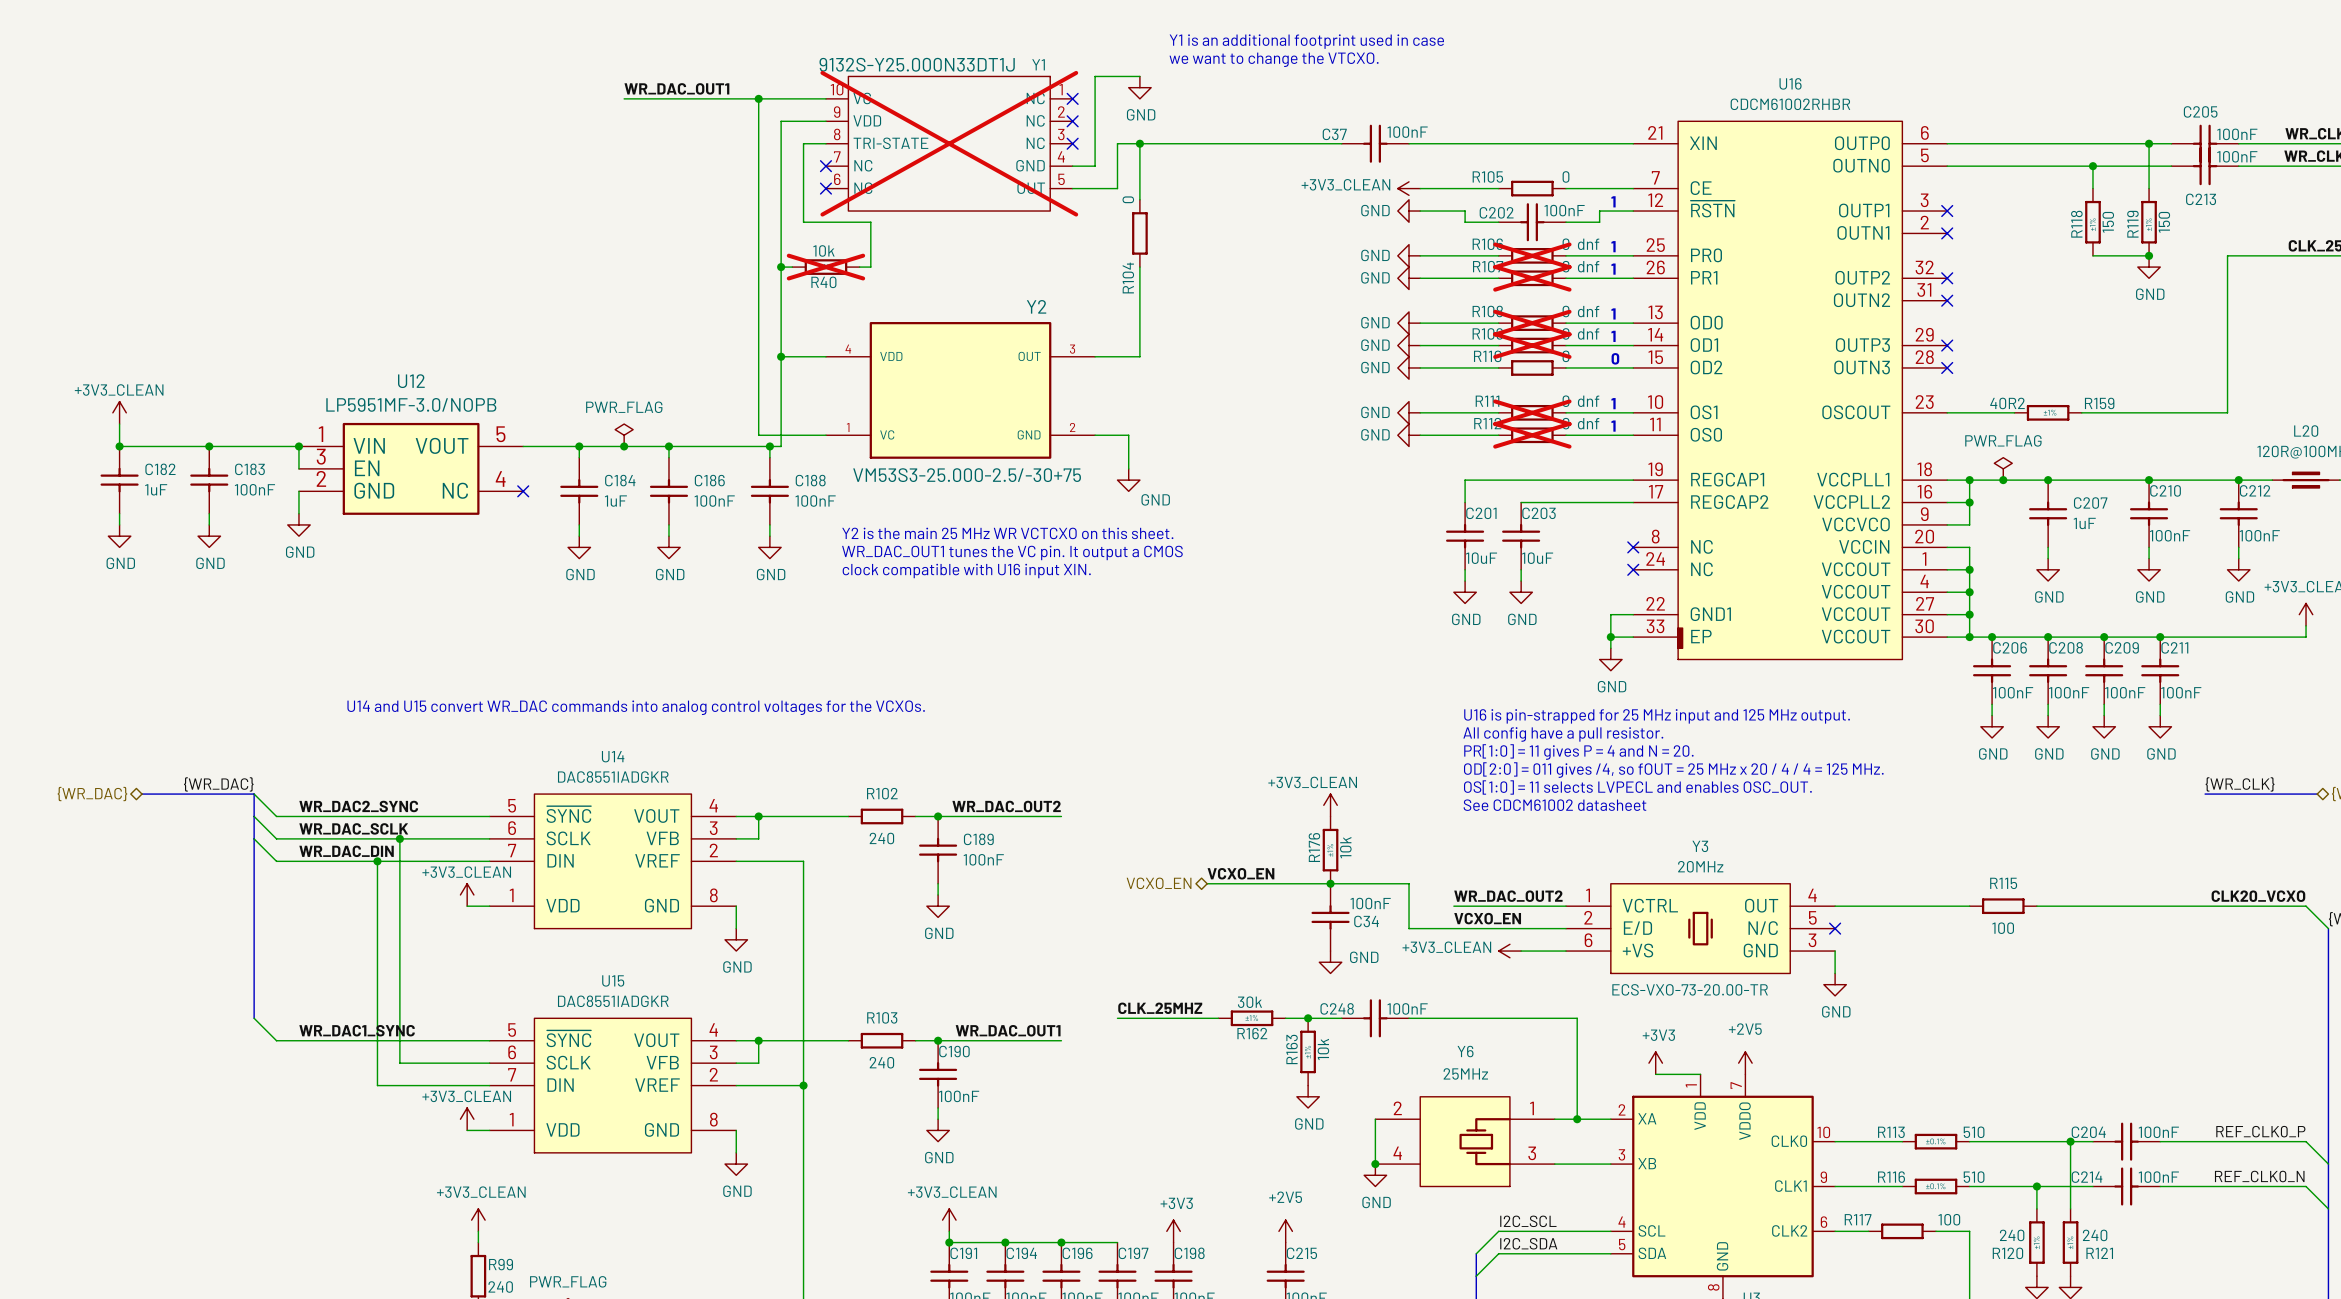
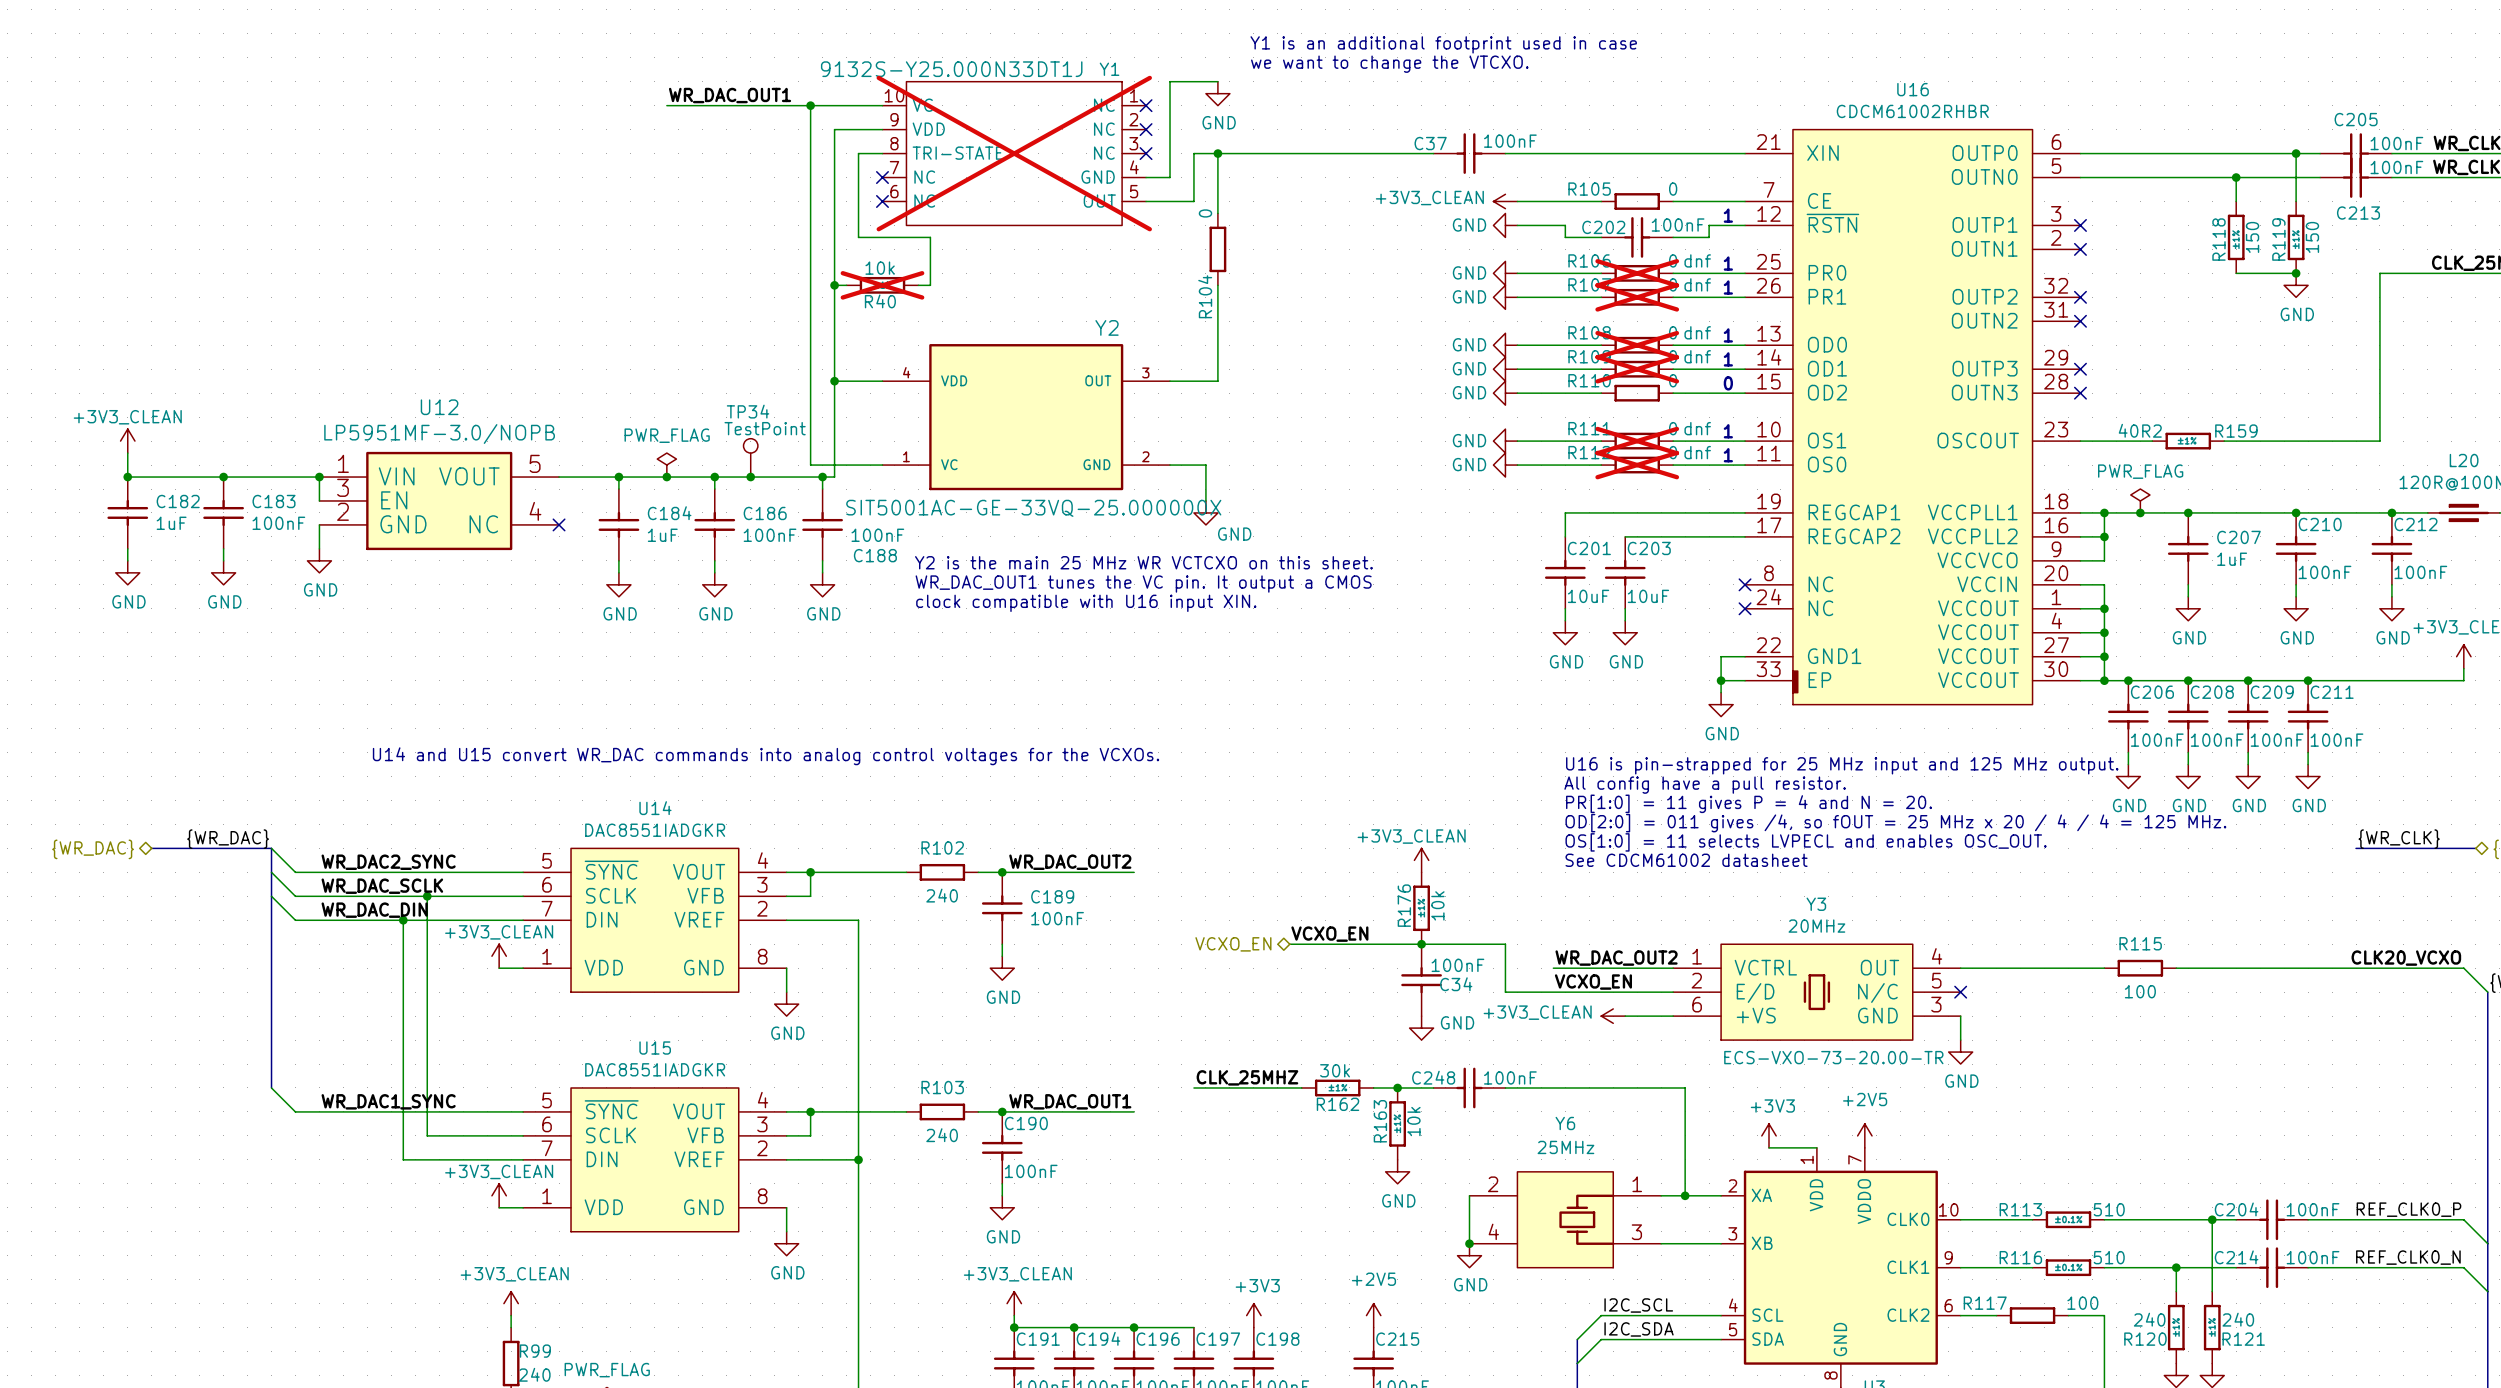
TP34: none -> TestPoint (750, 457)
junction: none -> (750, 477)
Y2 value: VM53S3-25.000-2.5/-30+75 (967, 475) -> SIT5001AC-GE-33VQ-25.000000X (1033, 508)
C188 name position: C188 (810, 480) -> C188 (875, 555)
text position: Y2 is the main 25 MHz WR VCTCXO on this sheet. (1007, 533) -> Y2 is the main 25 MHz WR VCTCXO on this sheet. (1143, 562)
text position: WR_DAC_OUT1 tunes the VC pin. It output a CMOS (1012, 552) -> WR_DAC_OUT1 tunes the VC pin. It output a CMOS (1143, 584)
text position: clock compatible with U16 input XIN. (966, 571) -> clock compatible with U16 input XIN. (1086, 603)

